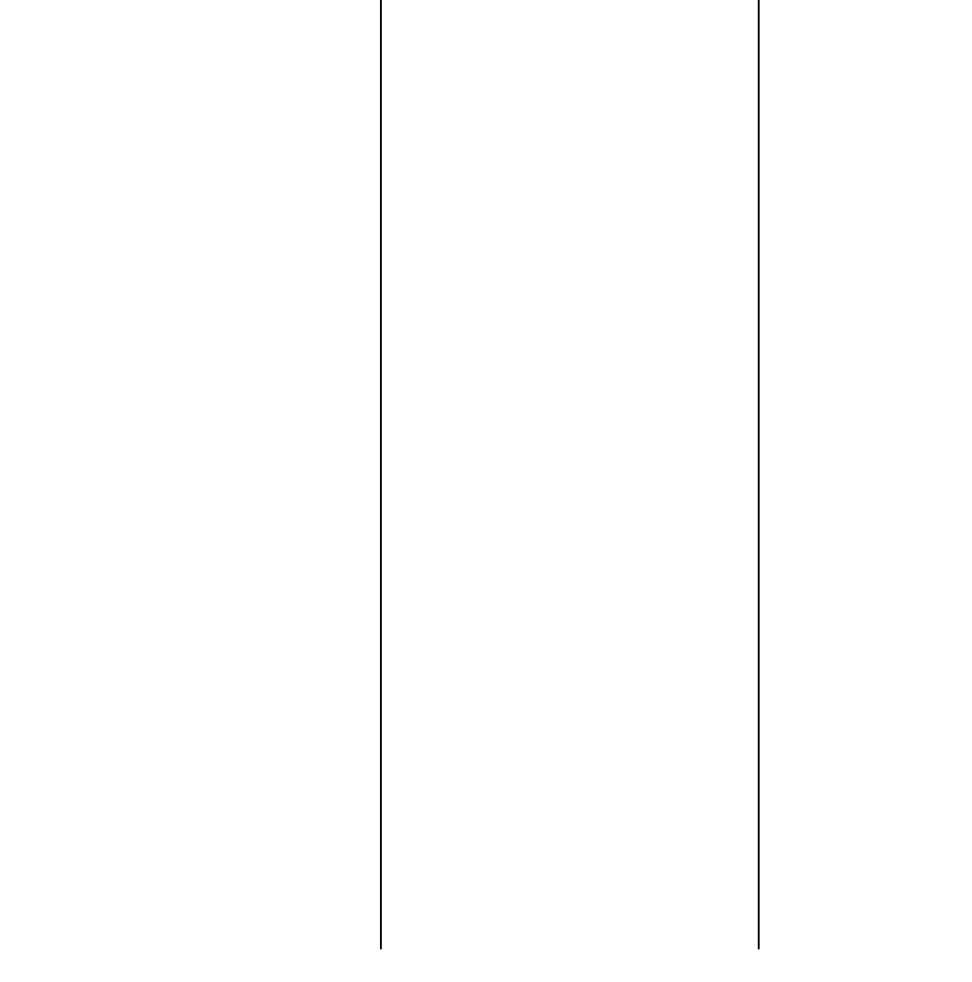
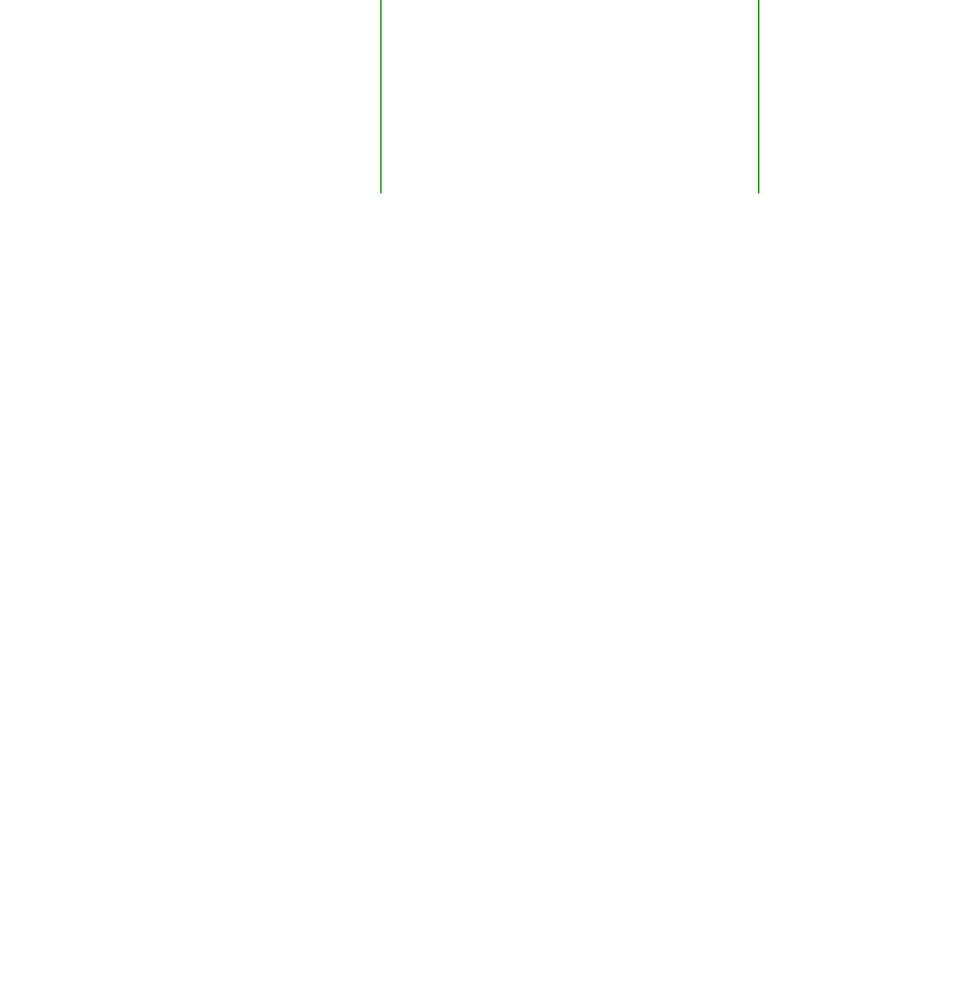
wire: (380, 193) (380, 948) -> none
wire: (758, 193) (758, 948) -> none

